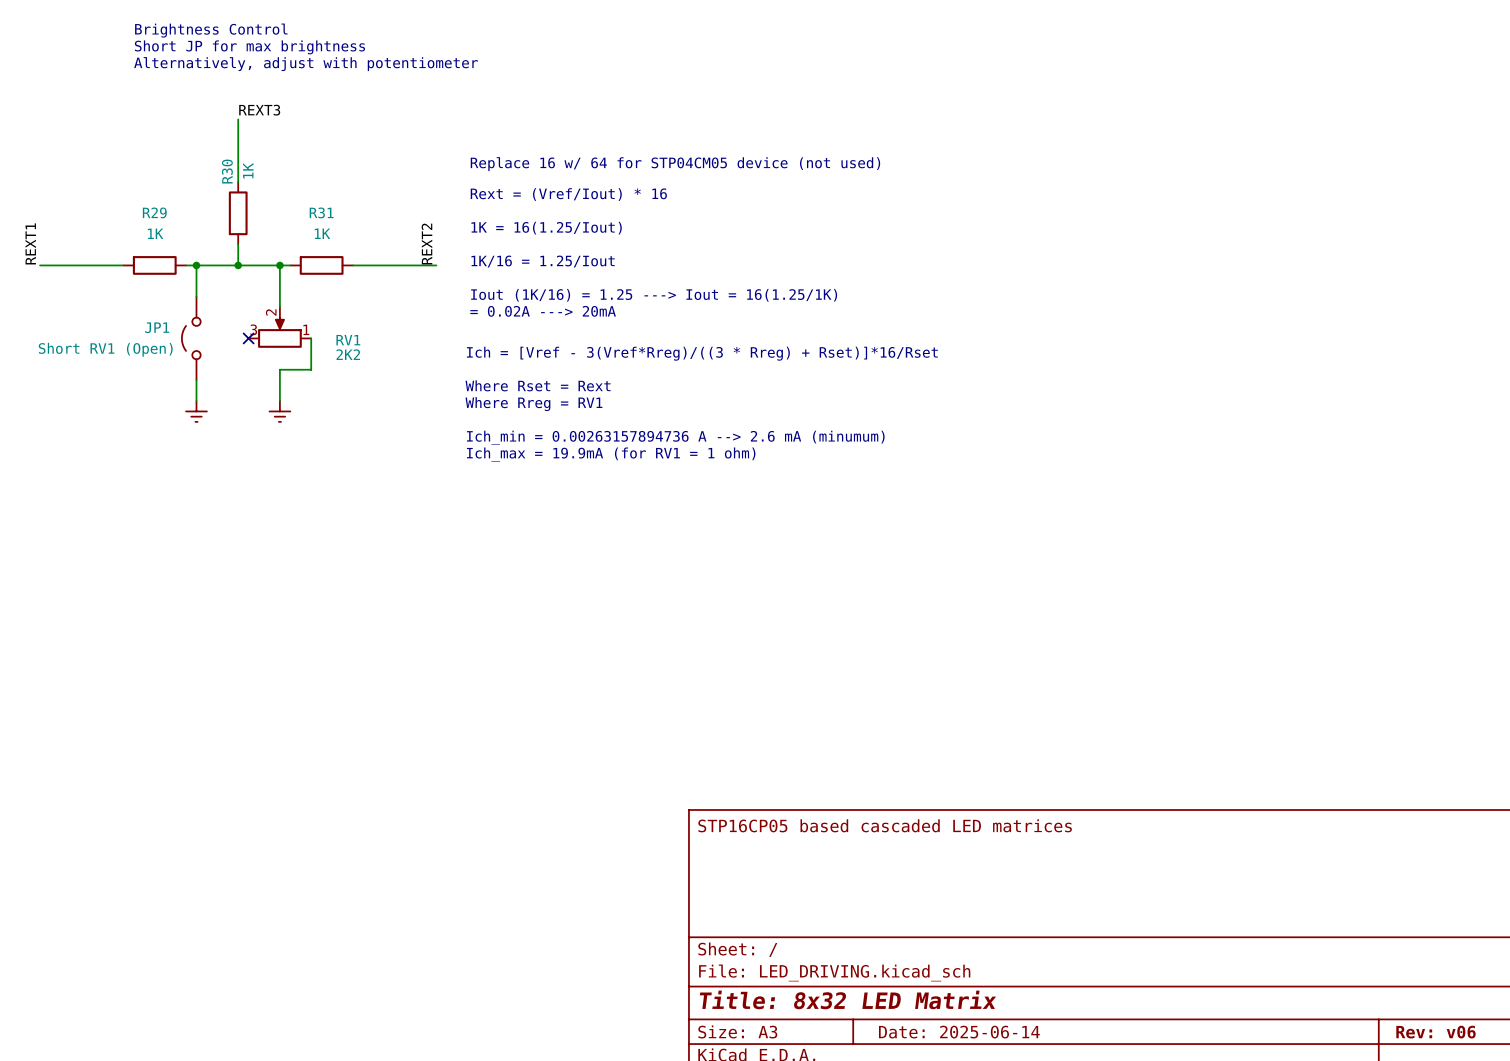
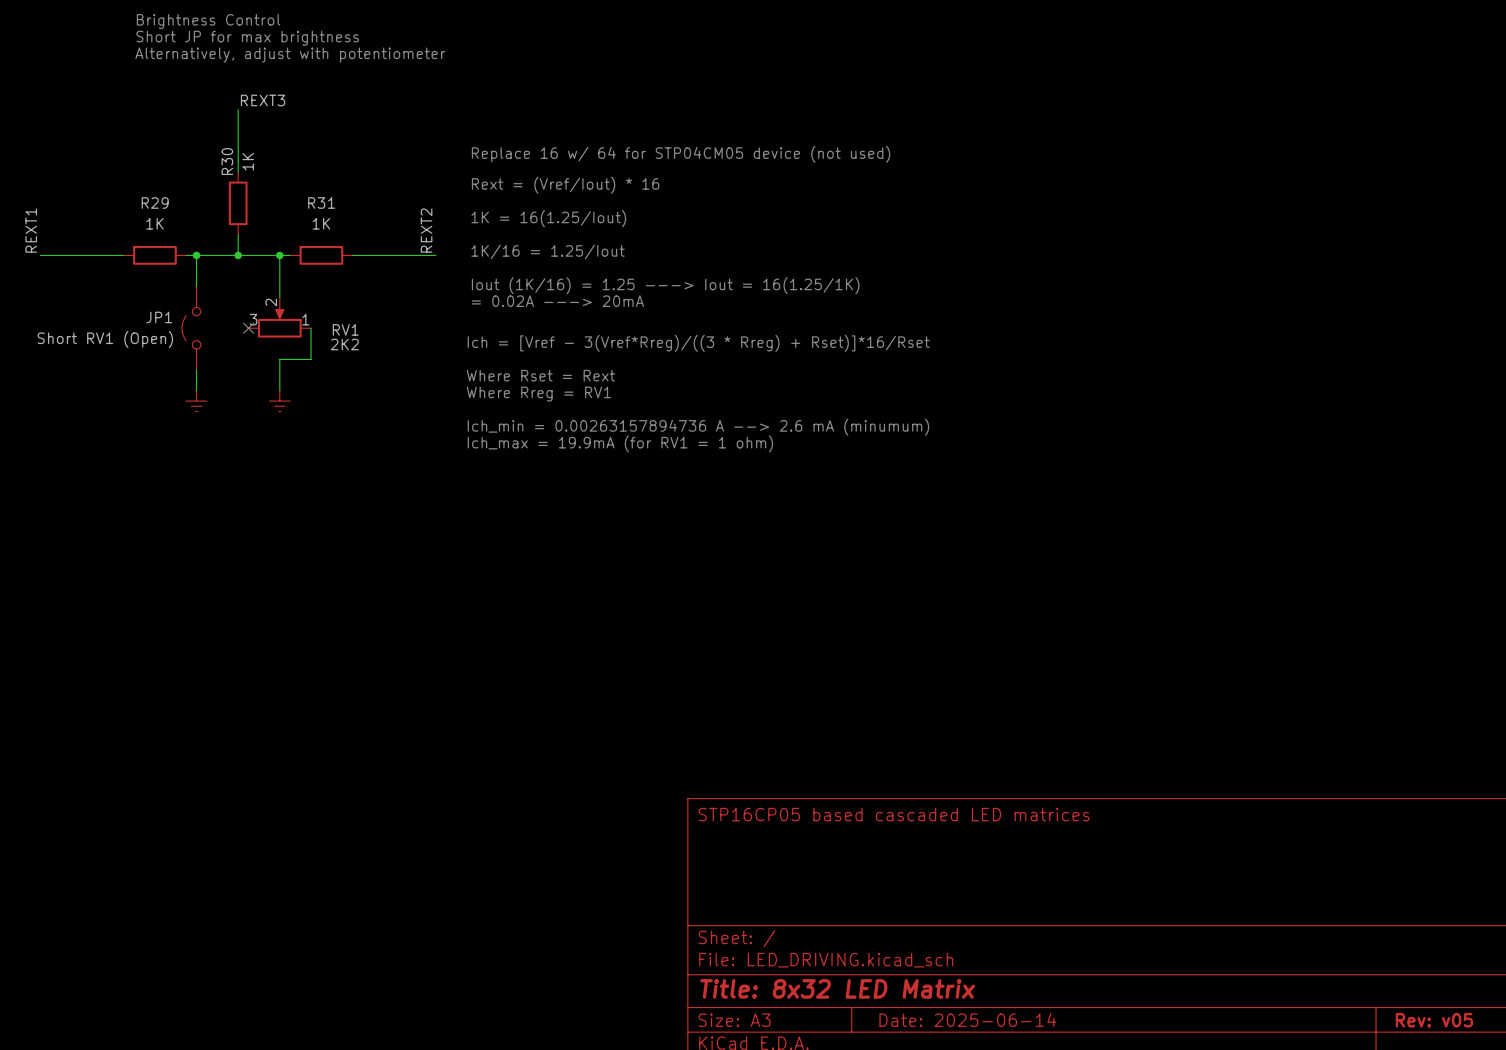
title block: Rev: v06 (1435, 1032) -> Rev: v05 (1434, 1020)

